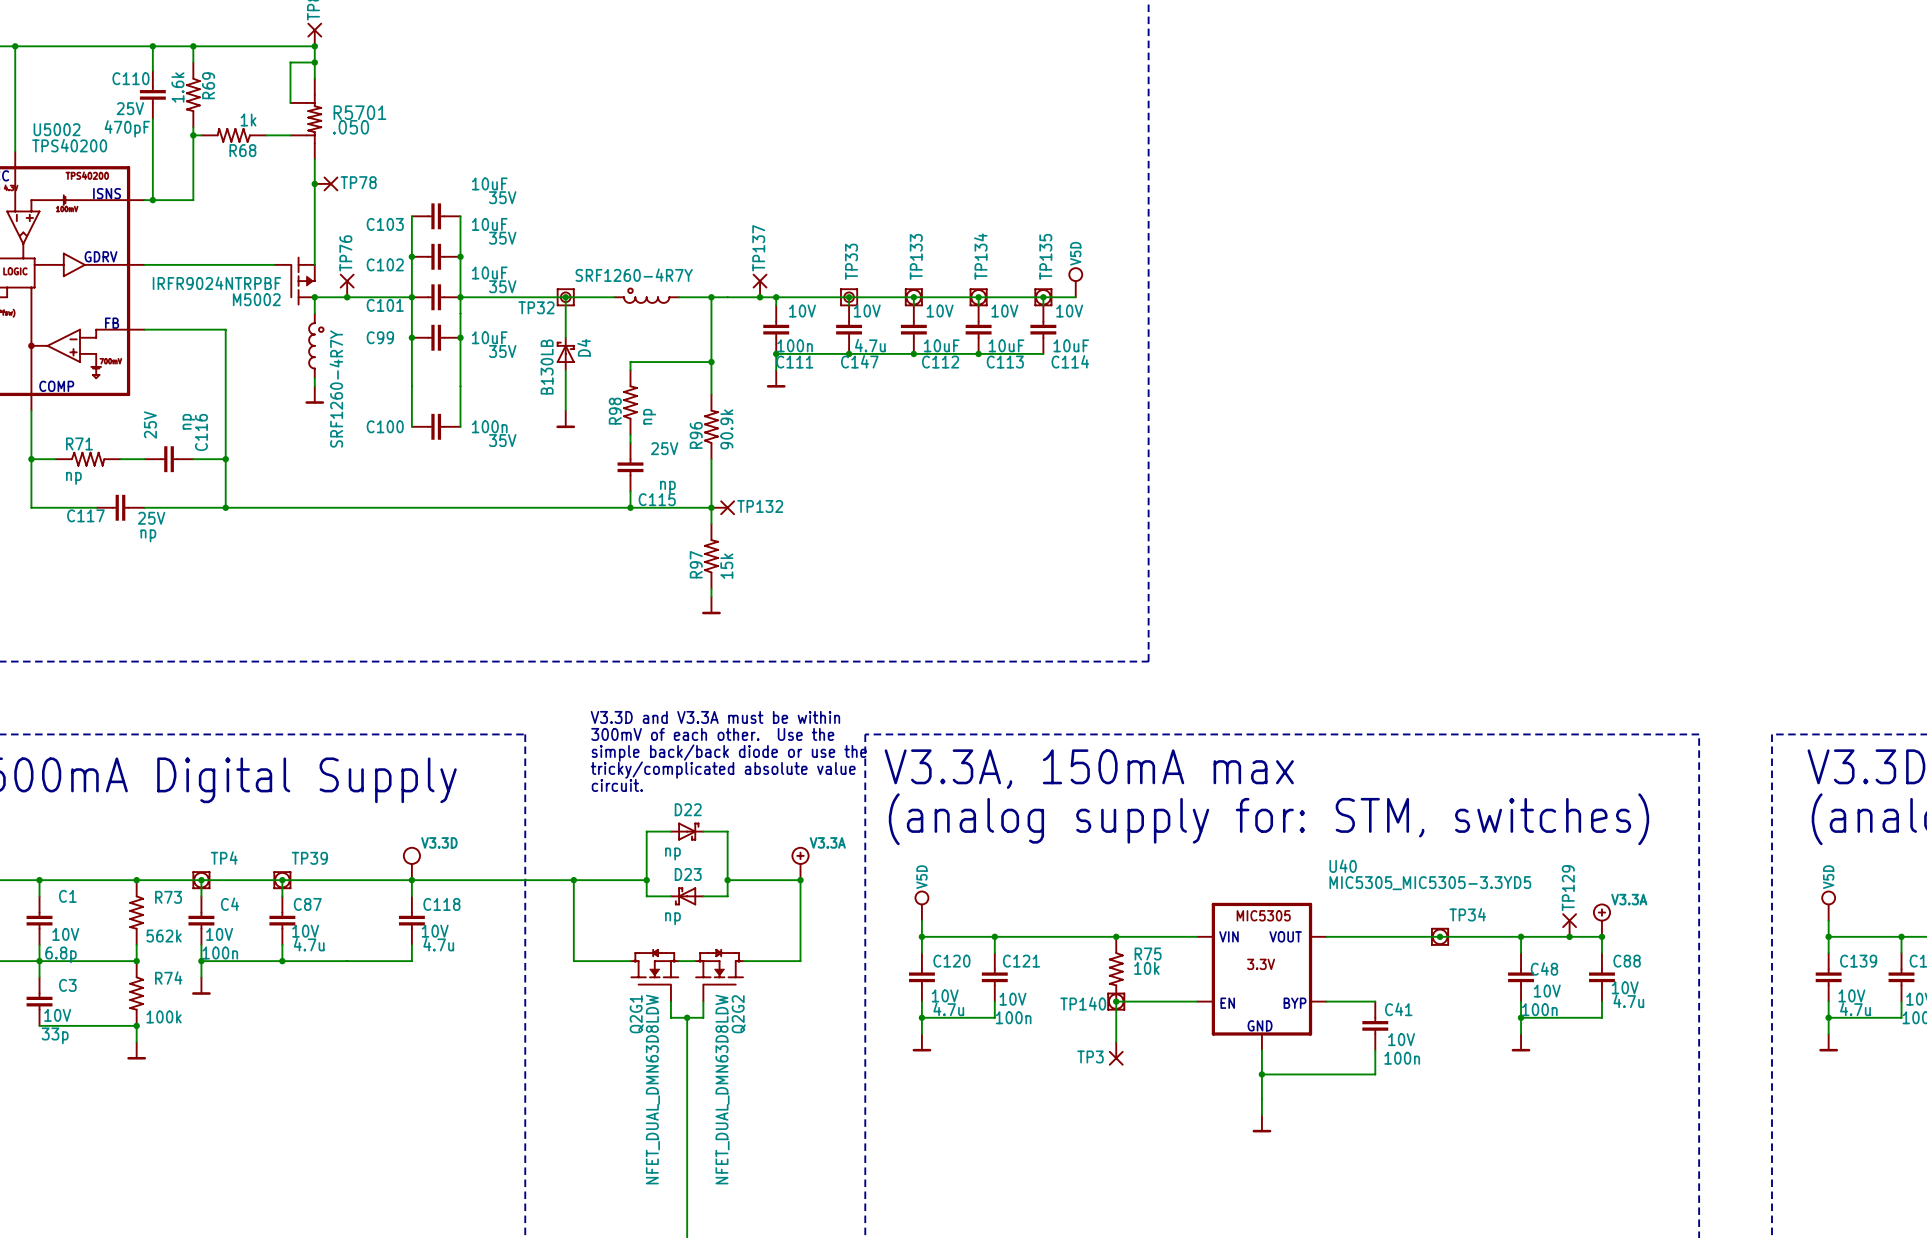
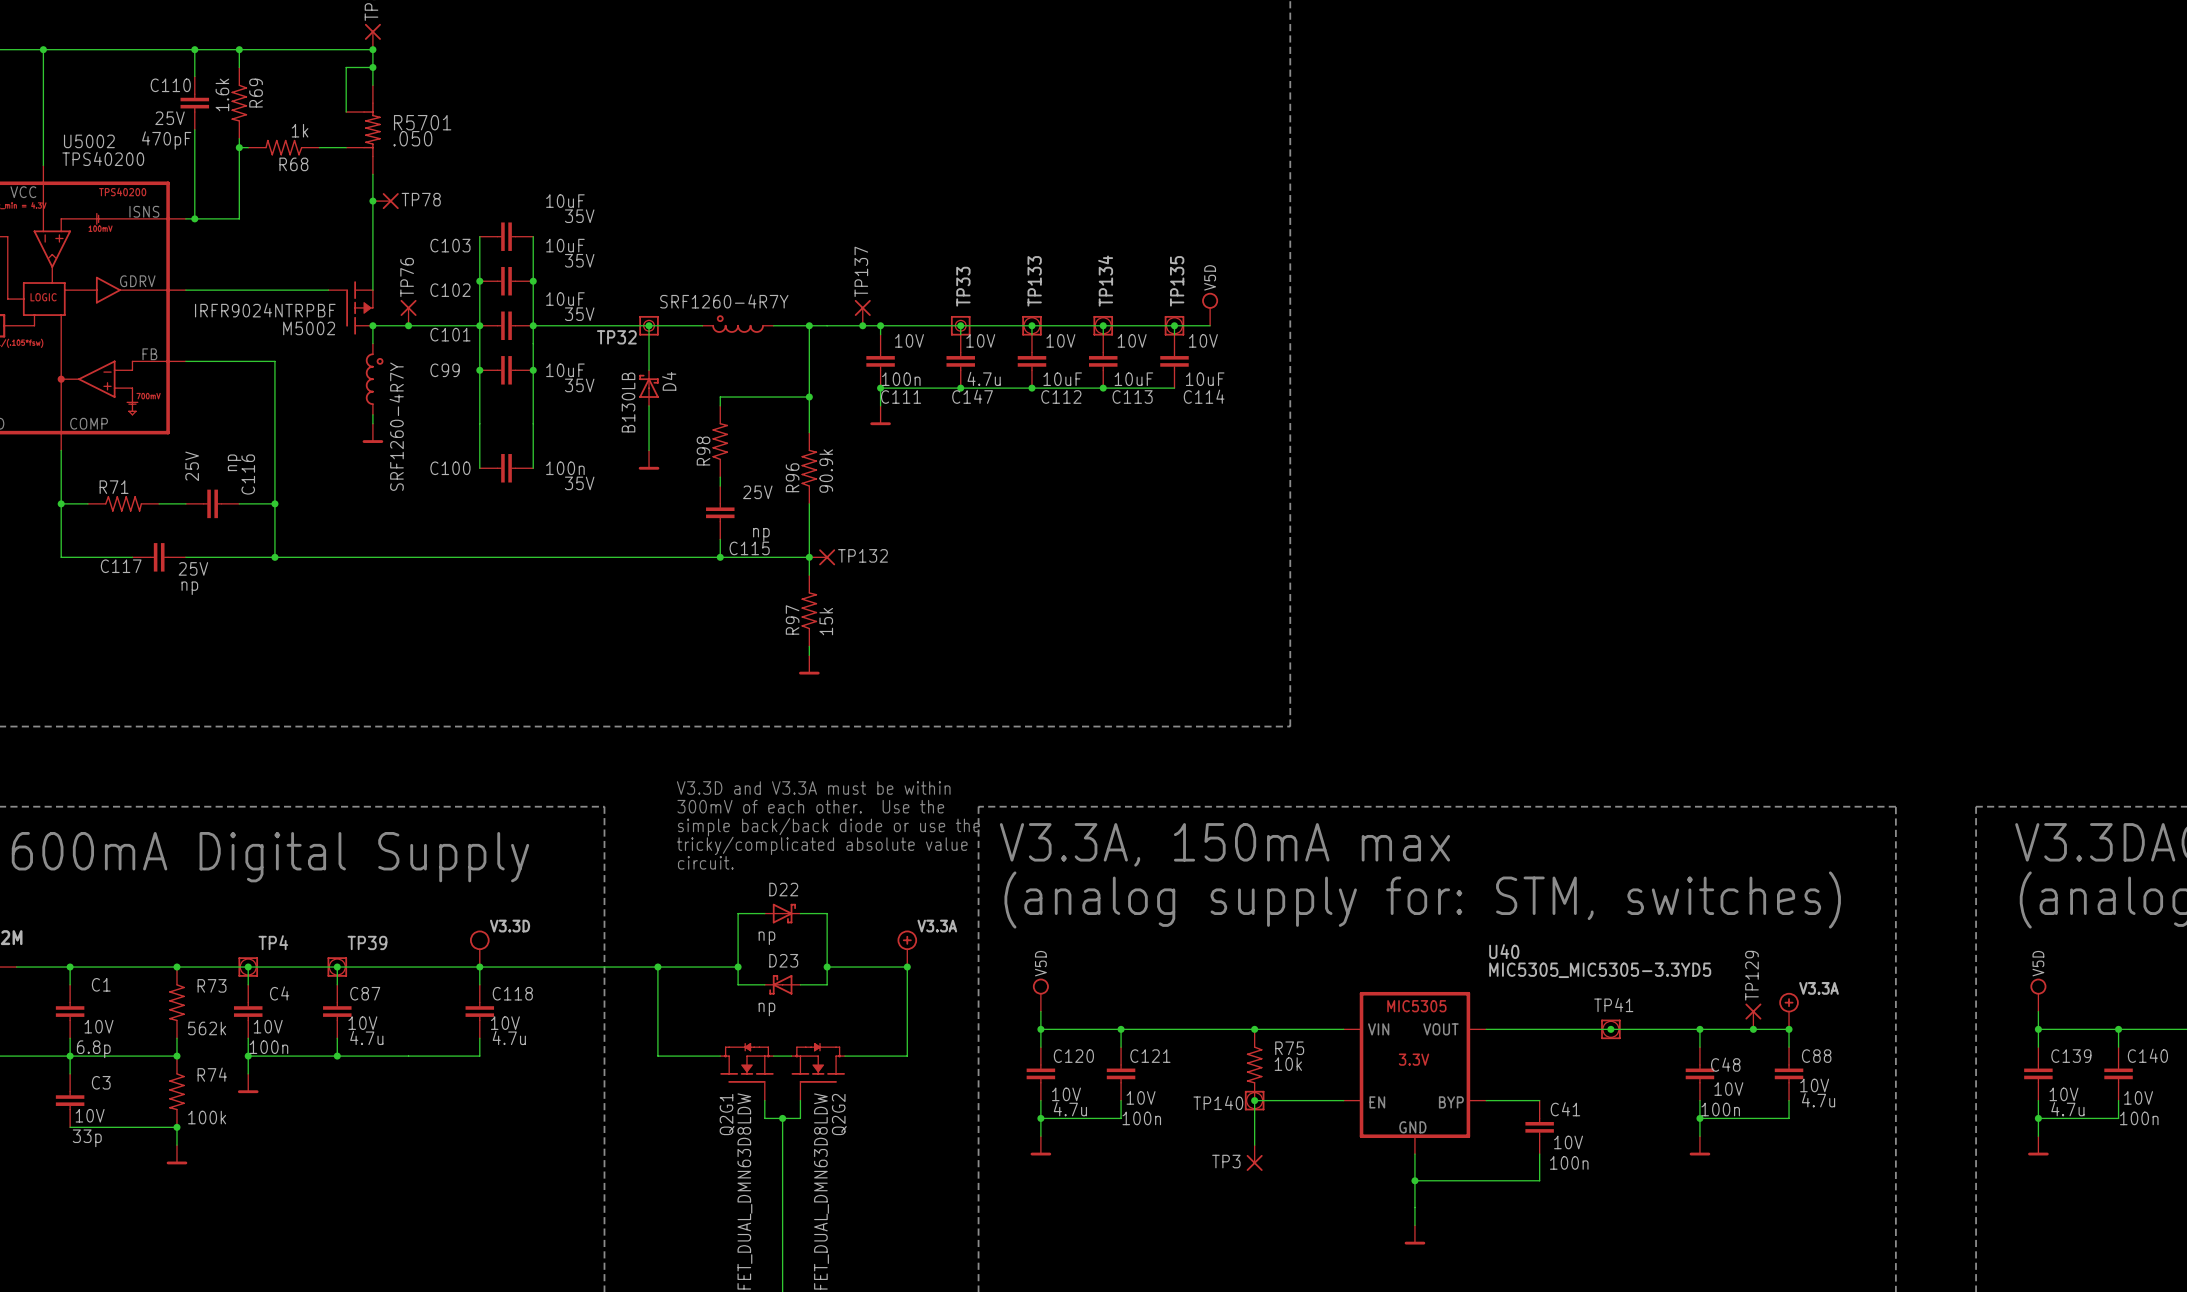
R98 value: np (649, 416) -> none
R71 value: np (73, 478) -> none
TP34 name: TP34 (1467, 914) -> TP41 (1613, 1005)

